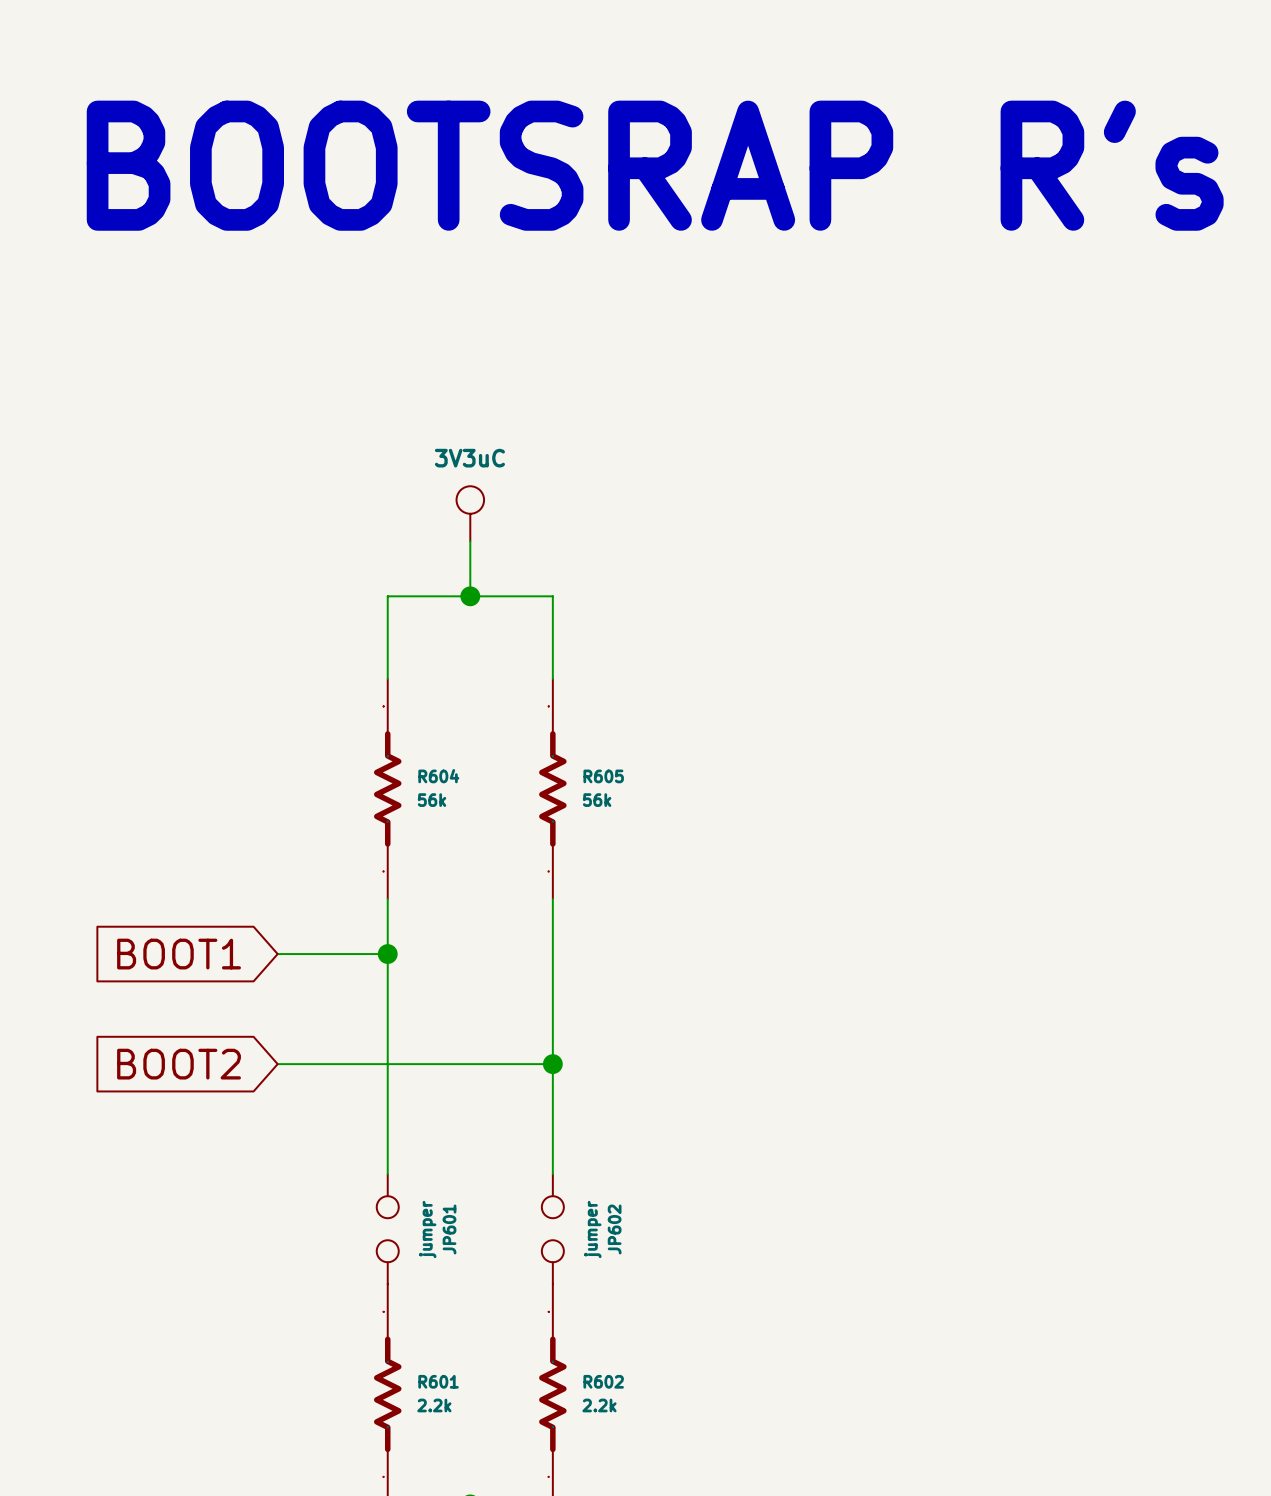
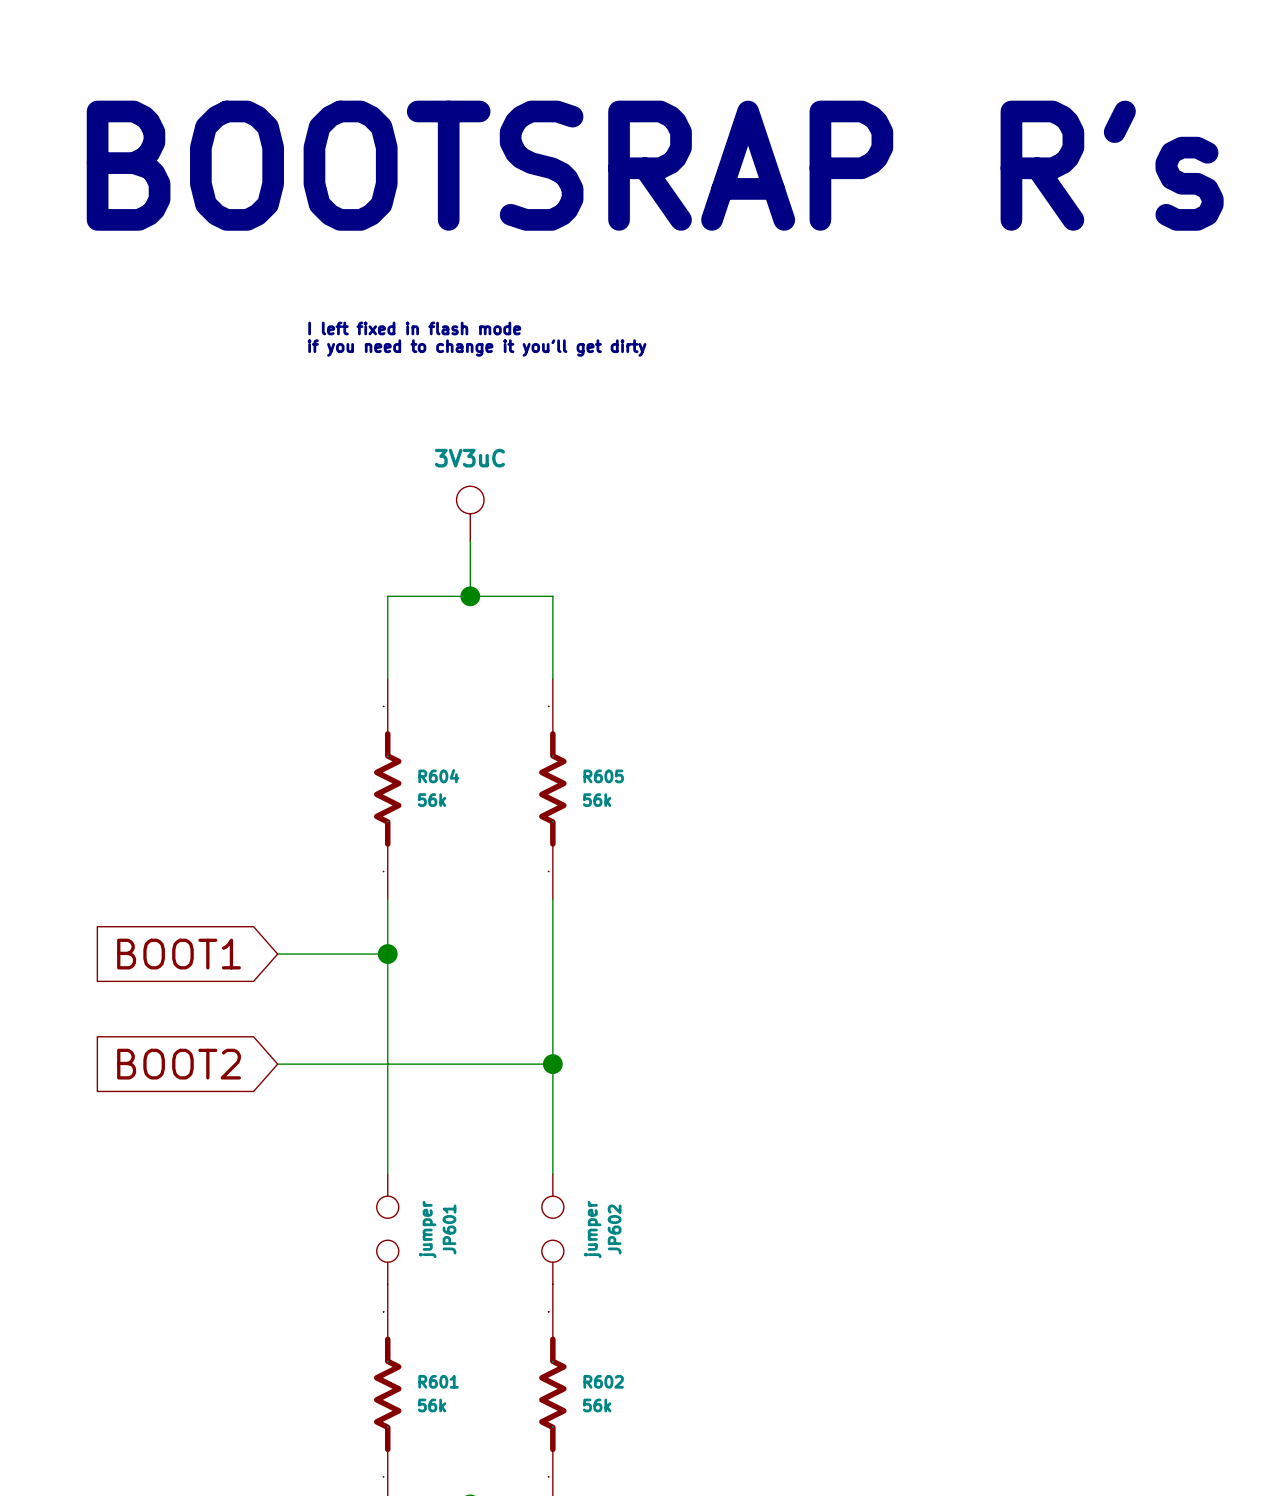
text: none -> I left fixed in flash mode (414, 328)
text: none -> if you need to change it you'll get dirty (477, 348)
R601 value: 2.2k (434, 1405) -> 56k (432, 1405)
R602 value: 2.2k (599, 1405) -> 56k (597, 1405)

